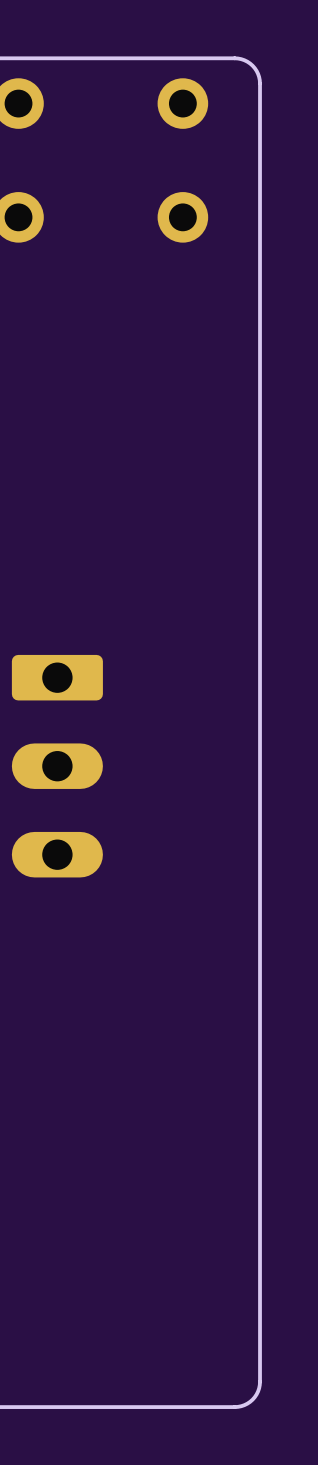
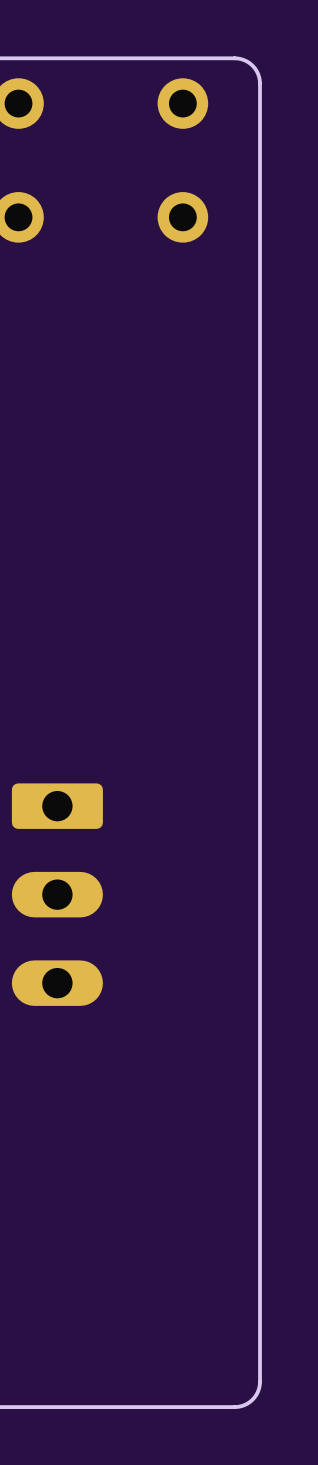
part position: (57, 766) -> (57, 894)

